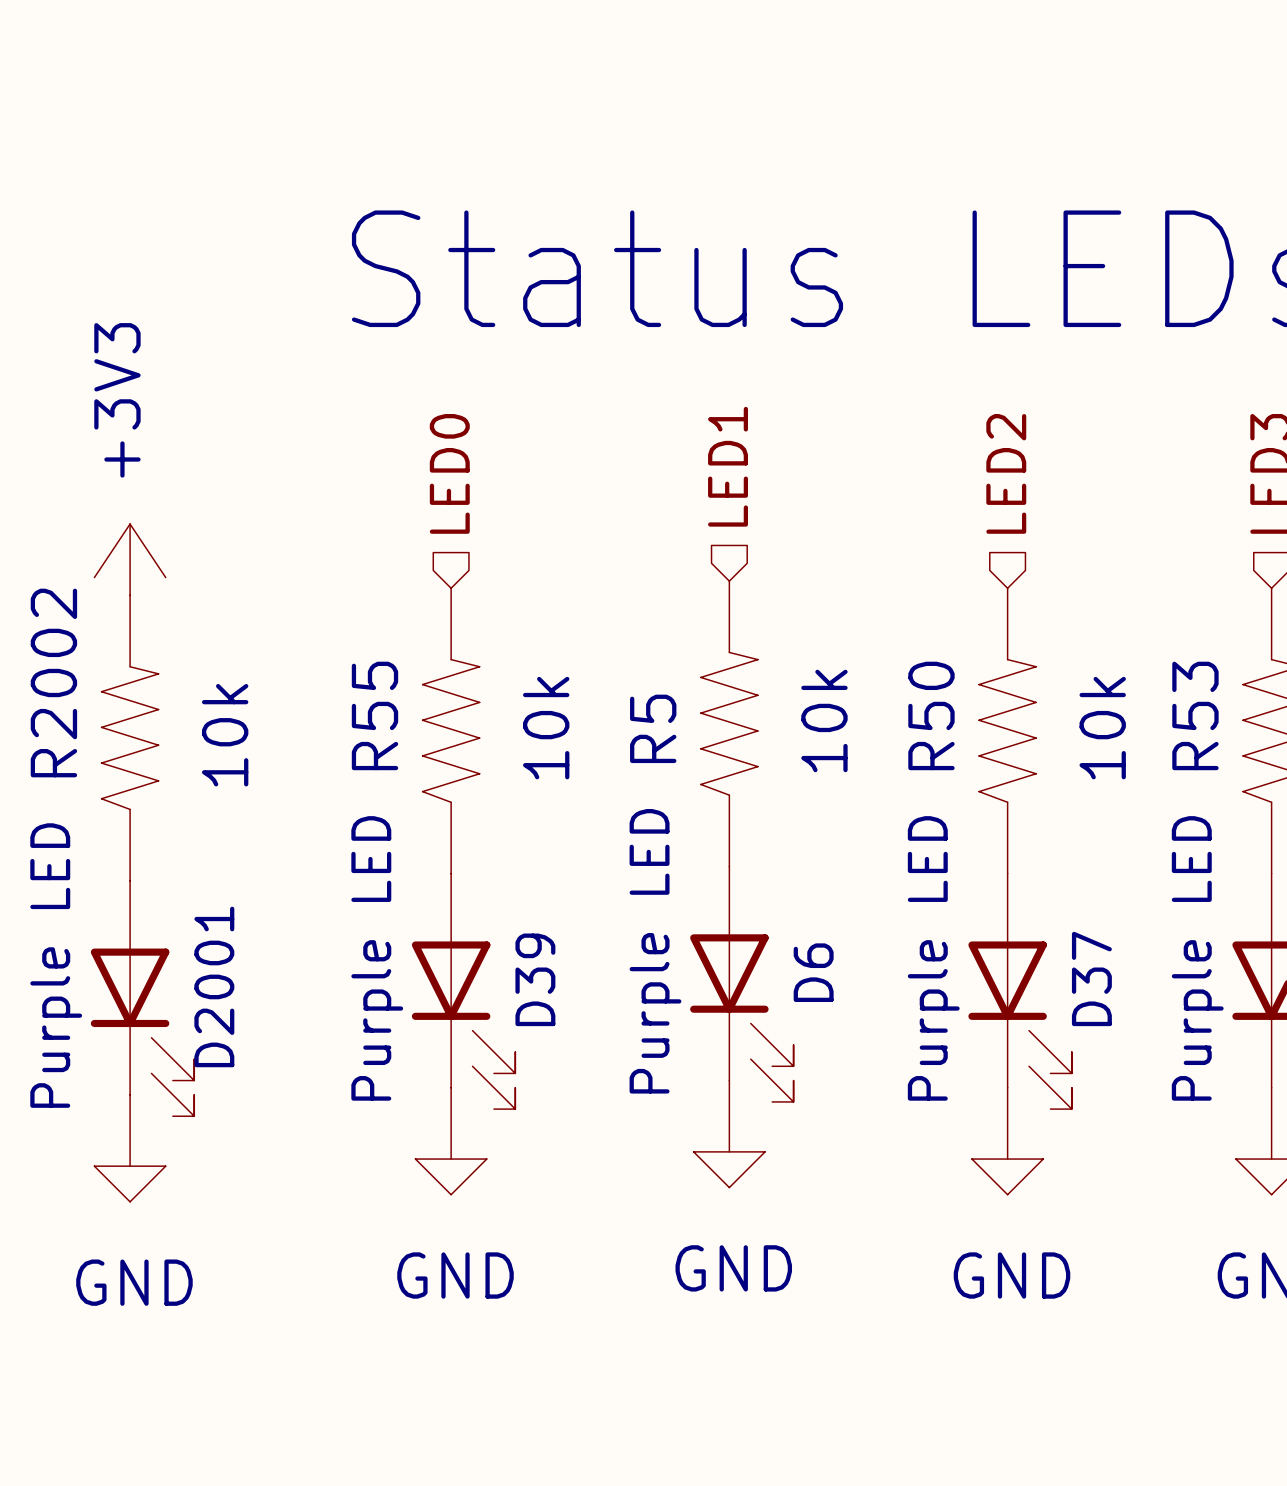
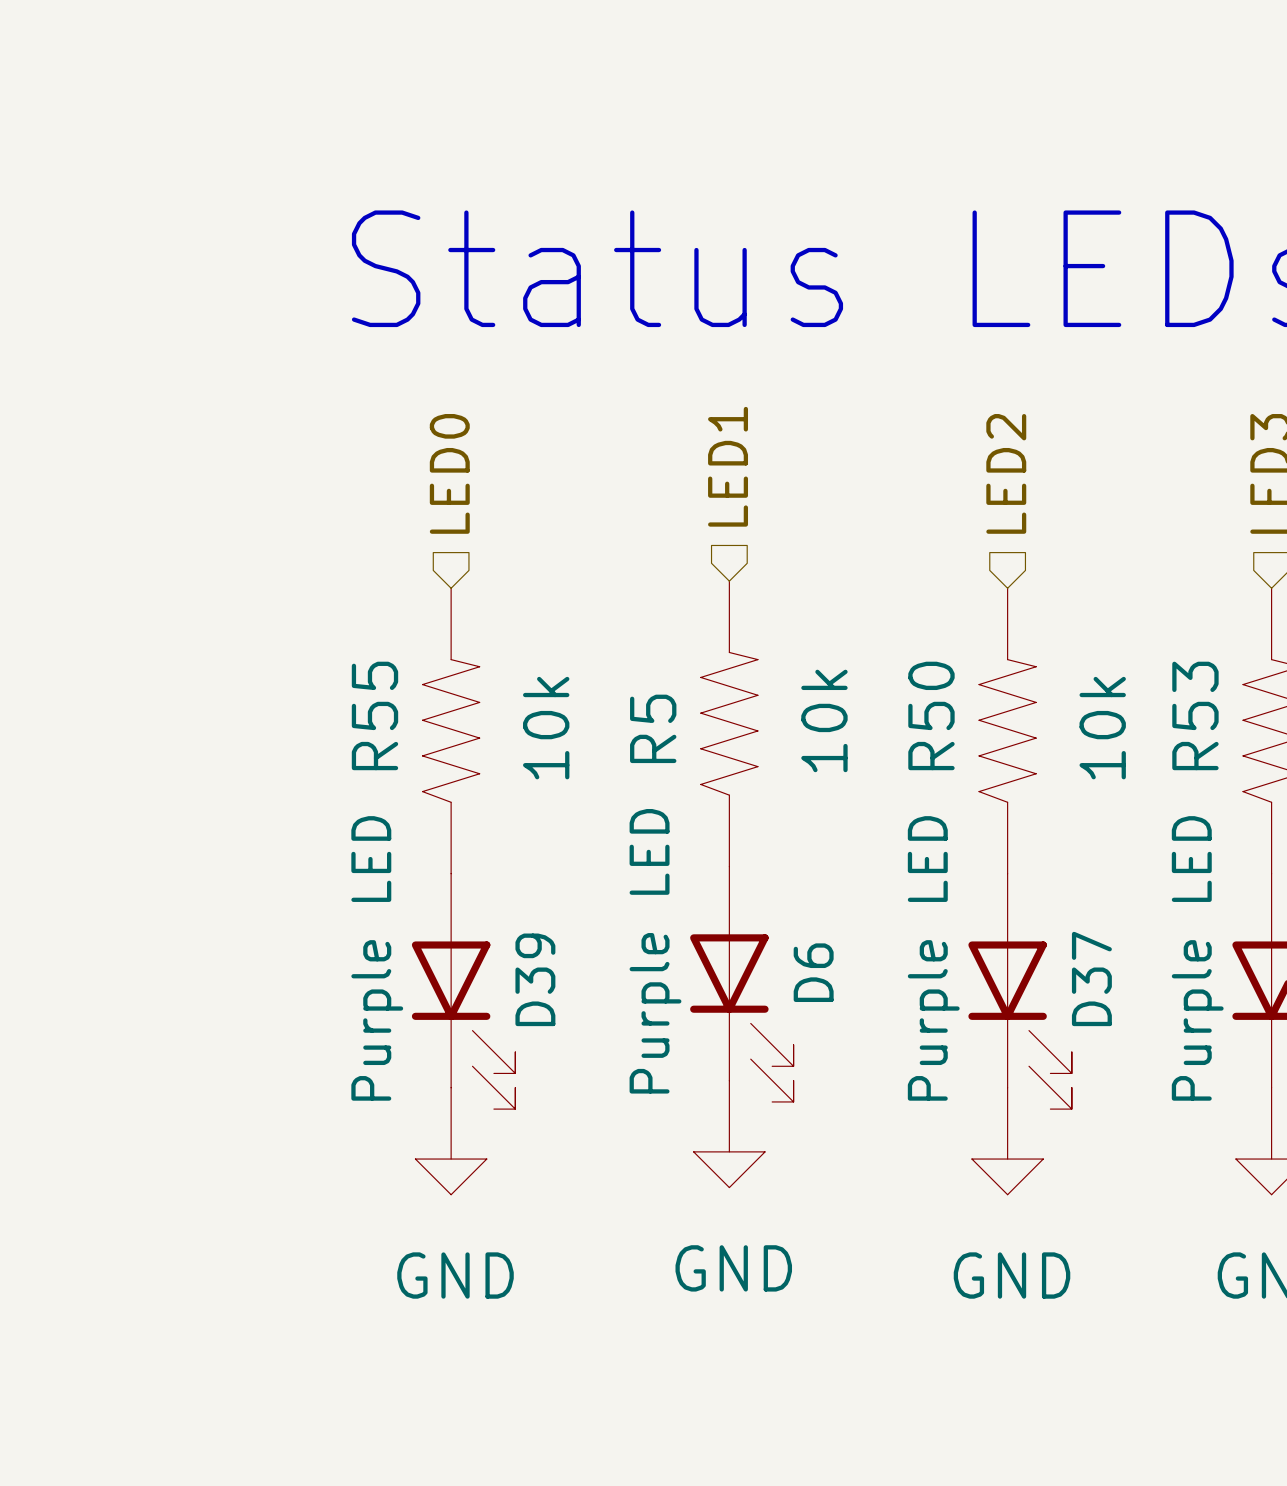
power symbol: +3V3 (130, 559) -> none
R2002: 10k (130, 738) -> none
D2001: Purple LED (142, 998) -> none
power symbol: GND (130, 1148) -> none

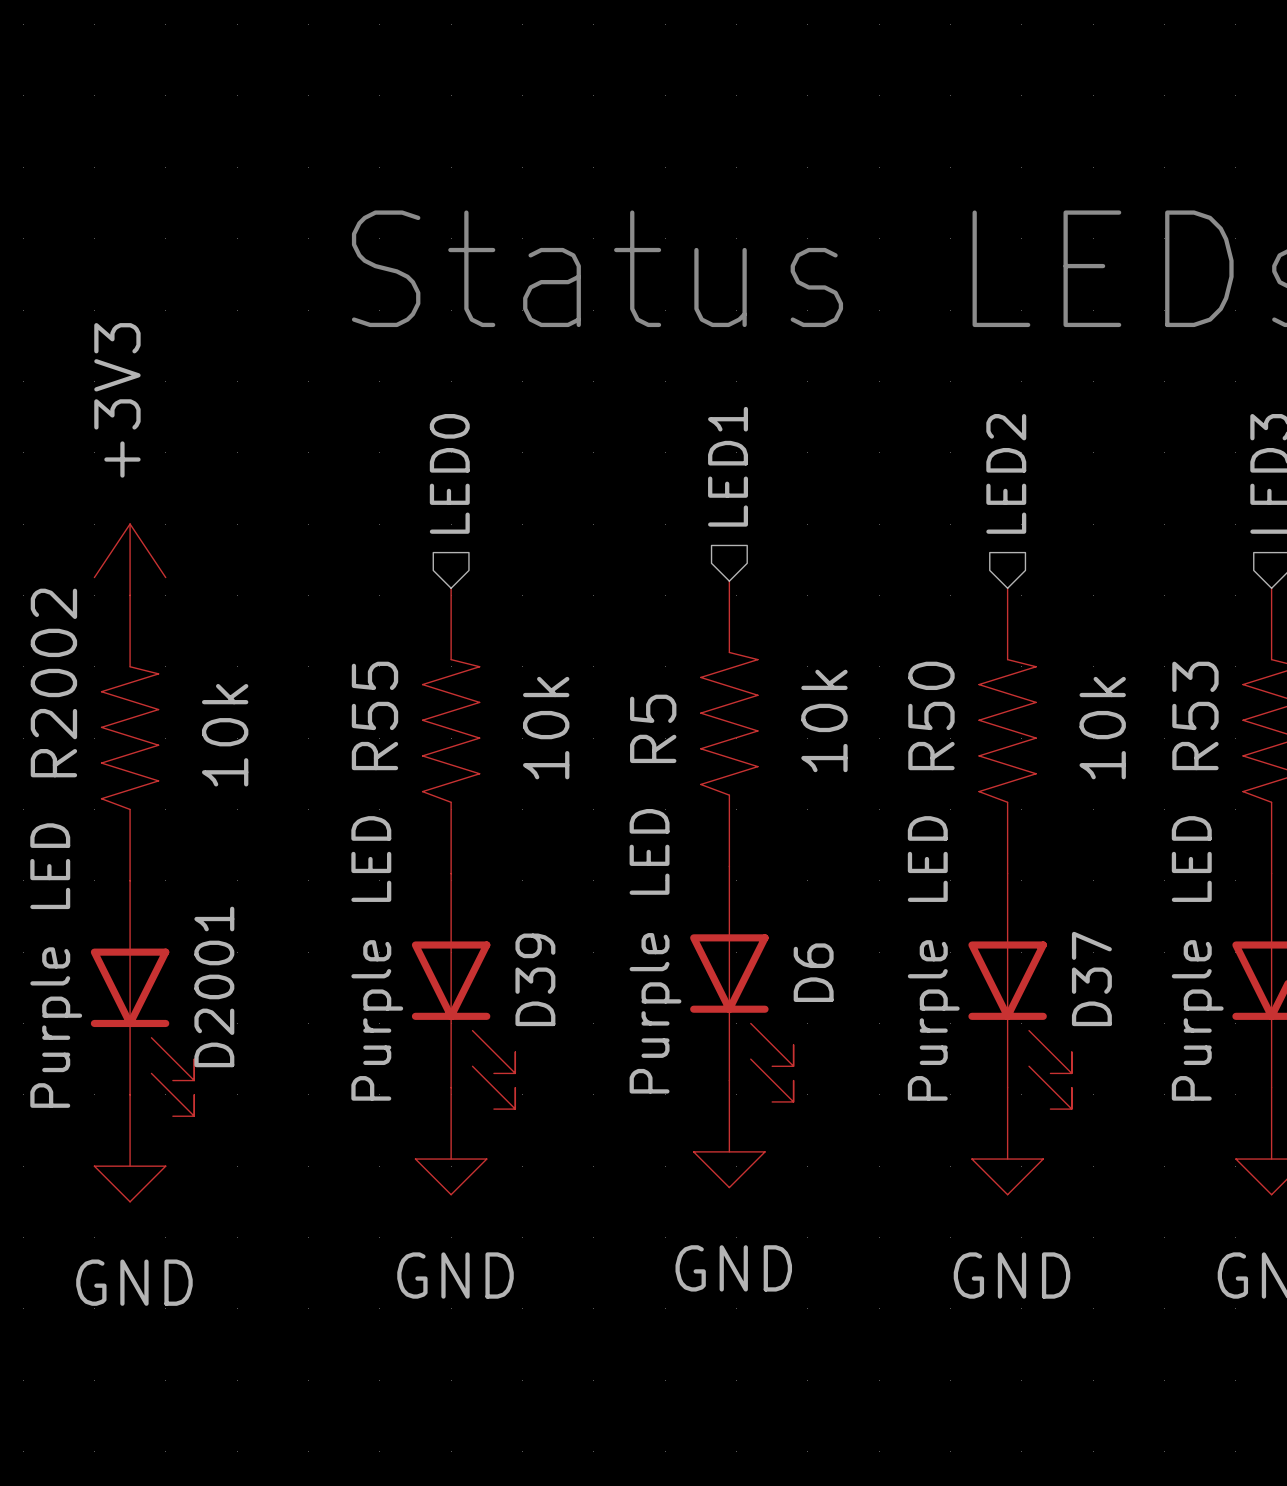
power symbol: none -> +3V3 (130, 559)
R2002: none -> 10k (130, 738)
D2001: none -> Purple LED (142, 998)
power symbol: none -> GND (130, 1148)

